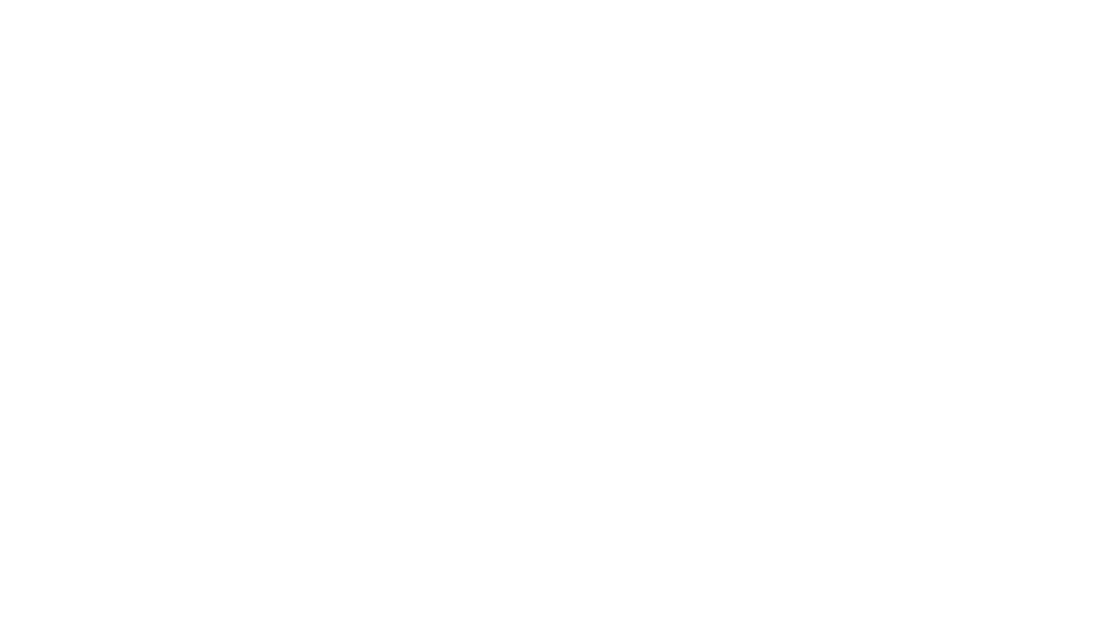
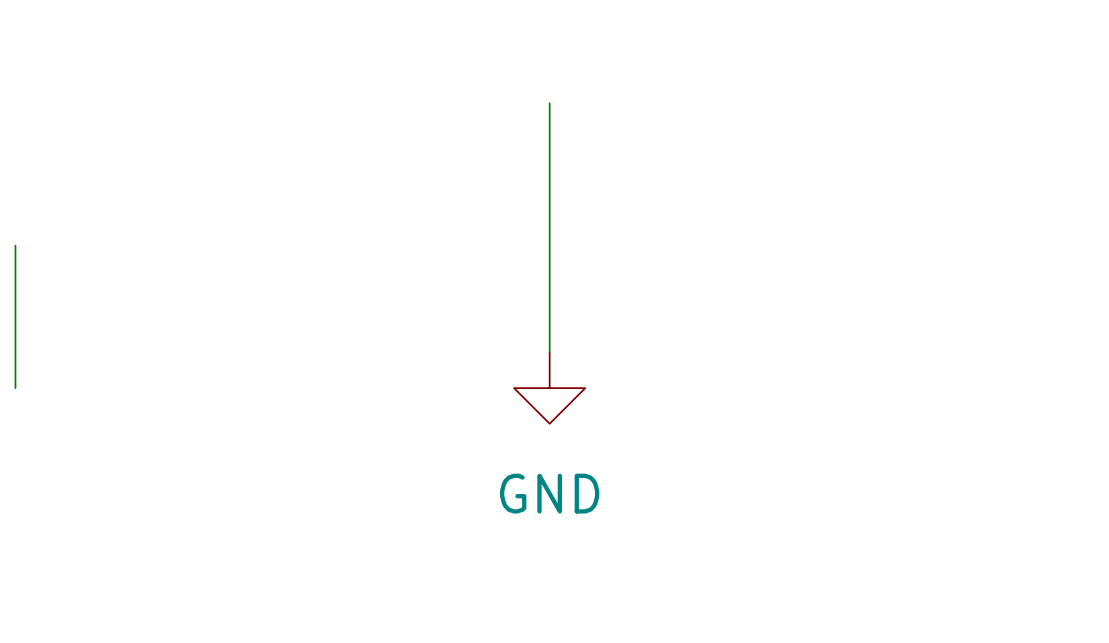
wire: none -> (549, 103) (549, 352)
wire: none -> (15, 245) (15, 388)
power symbol: none -> GND (549, 388)

